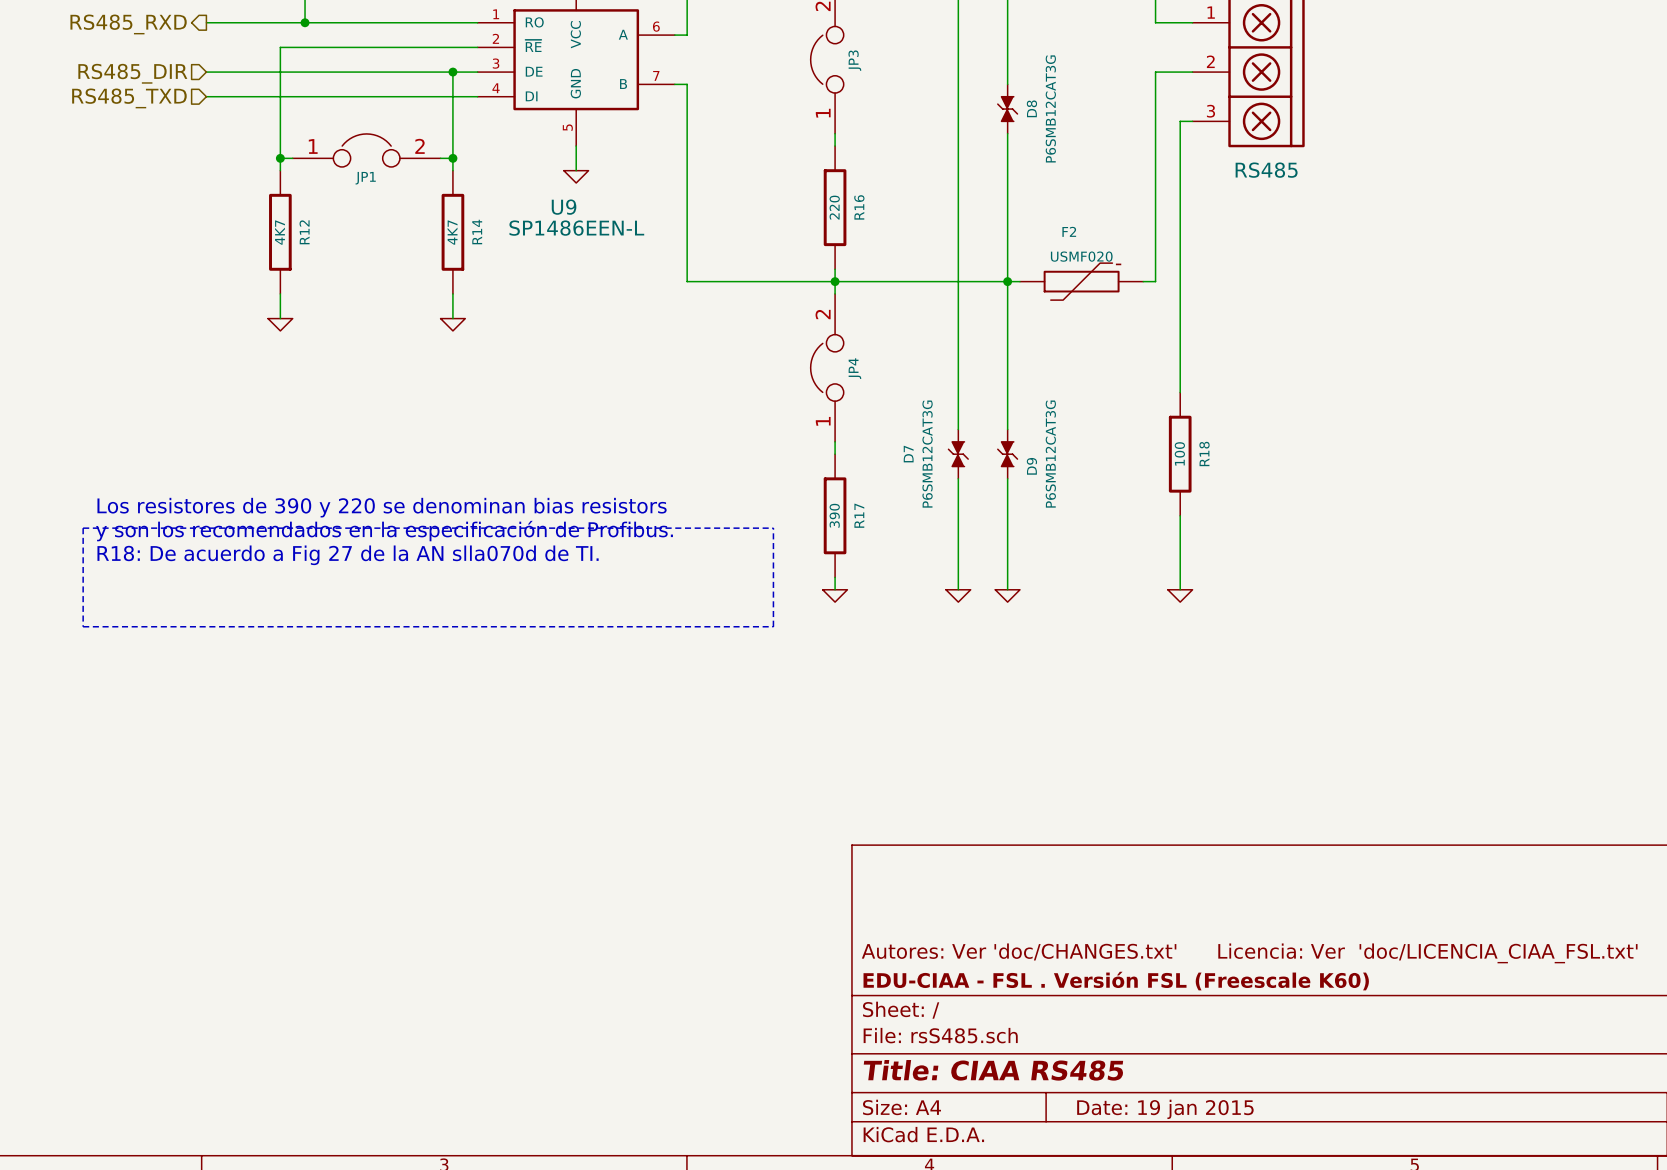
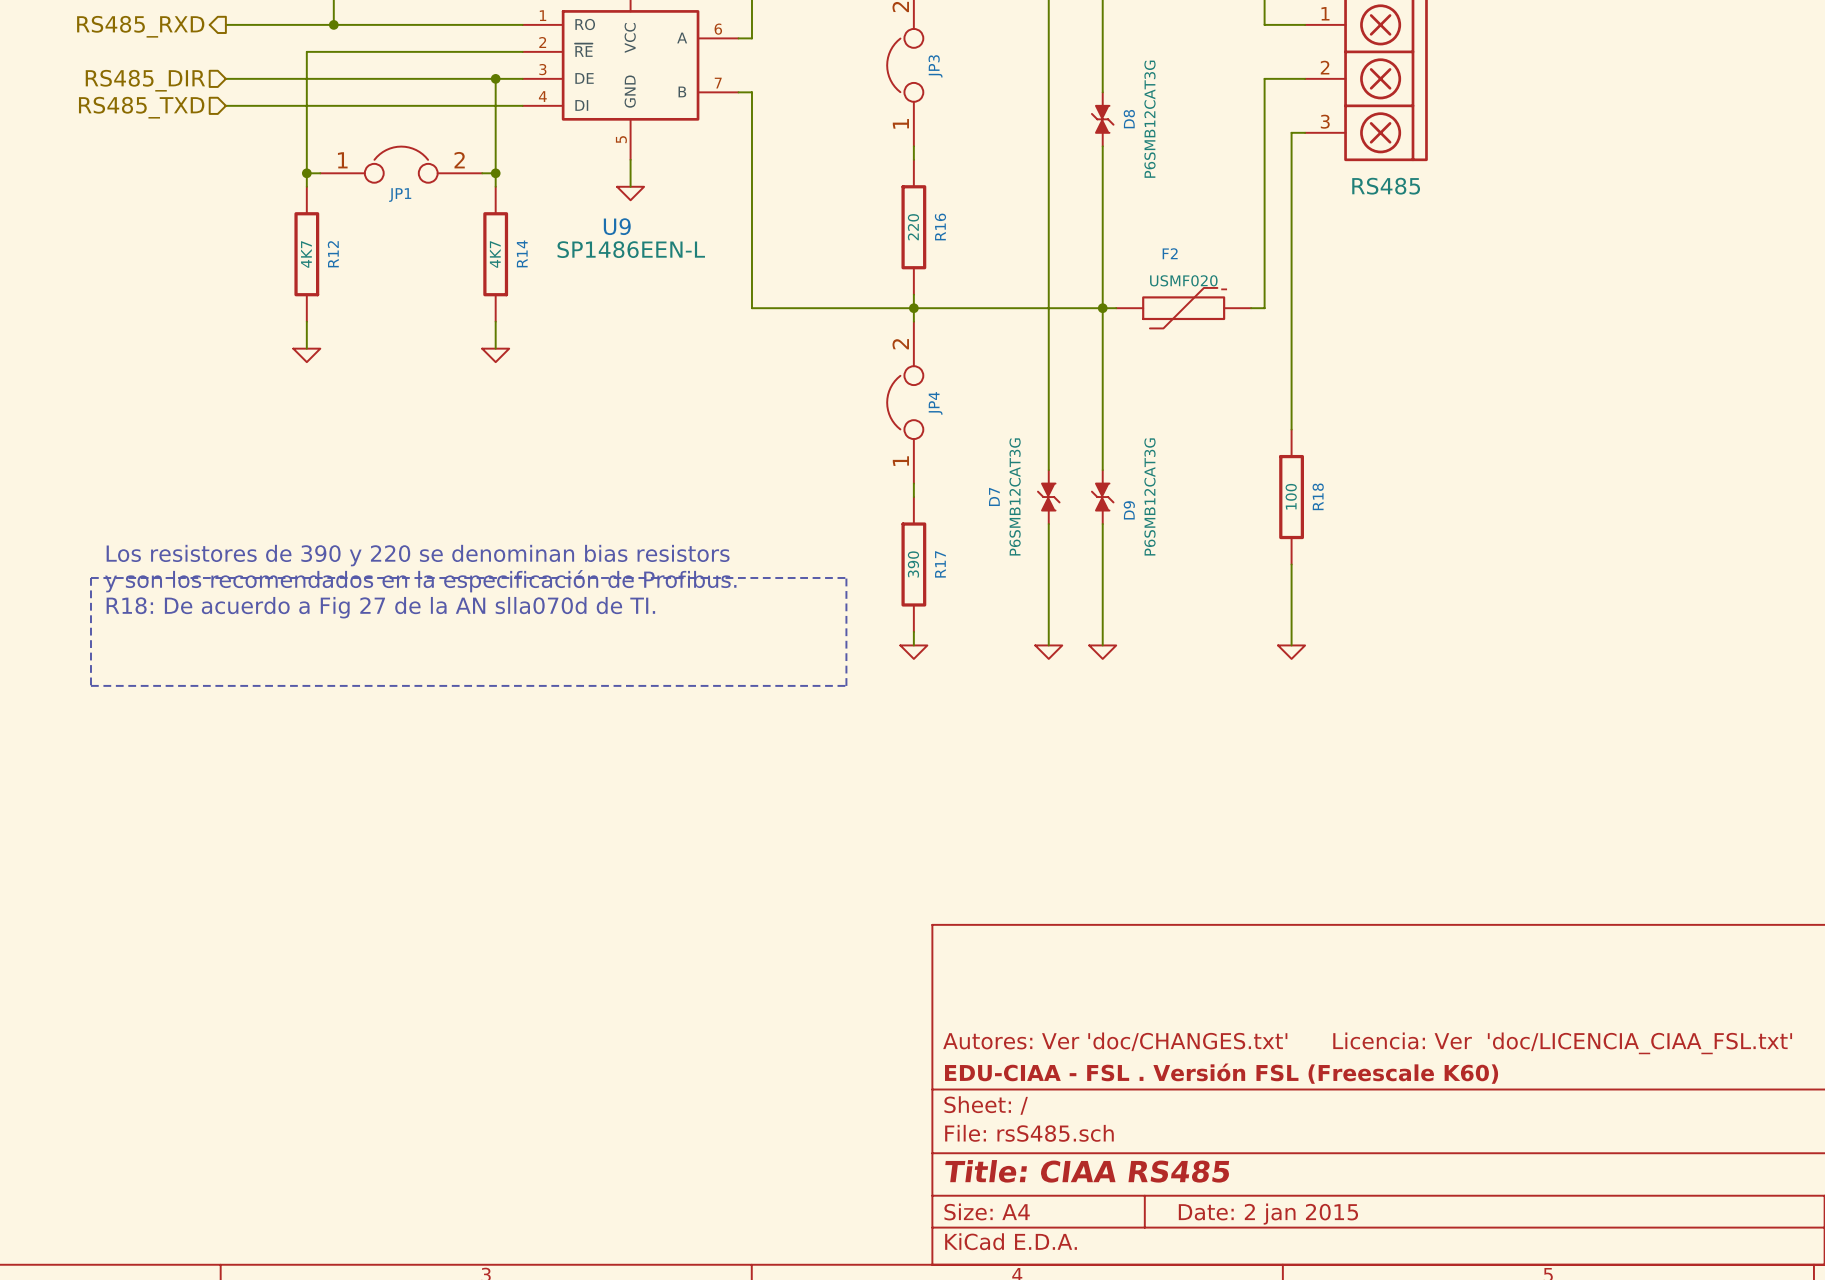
title block: Date: 19 jan 2015 (1165, 1109) -> Date: 2 jan 2015 (1268, 1214)

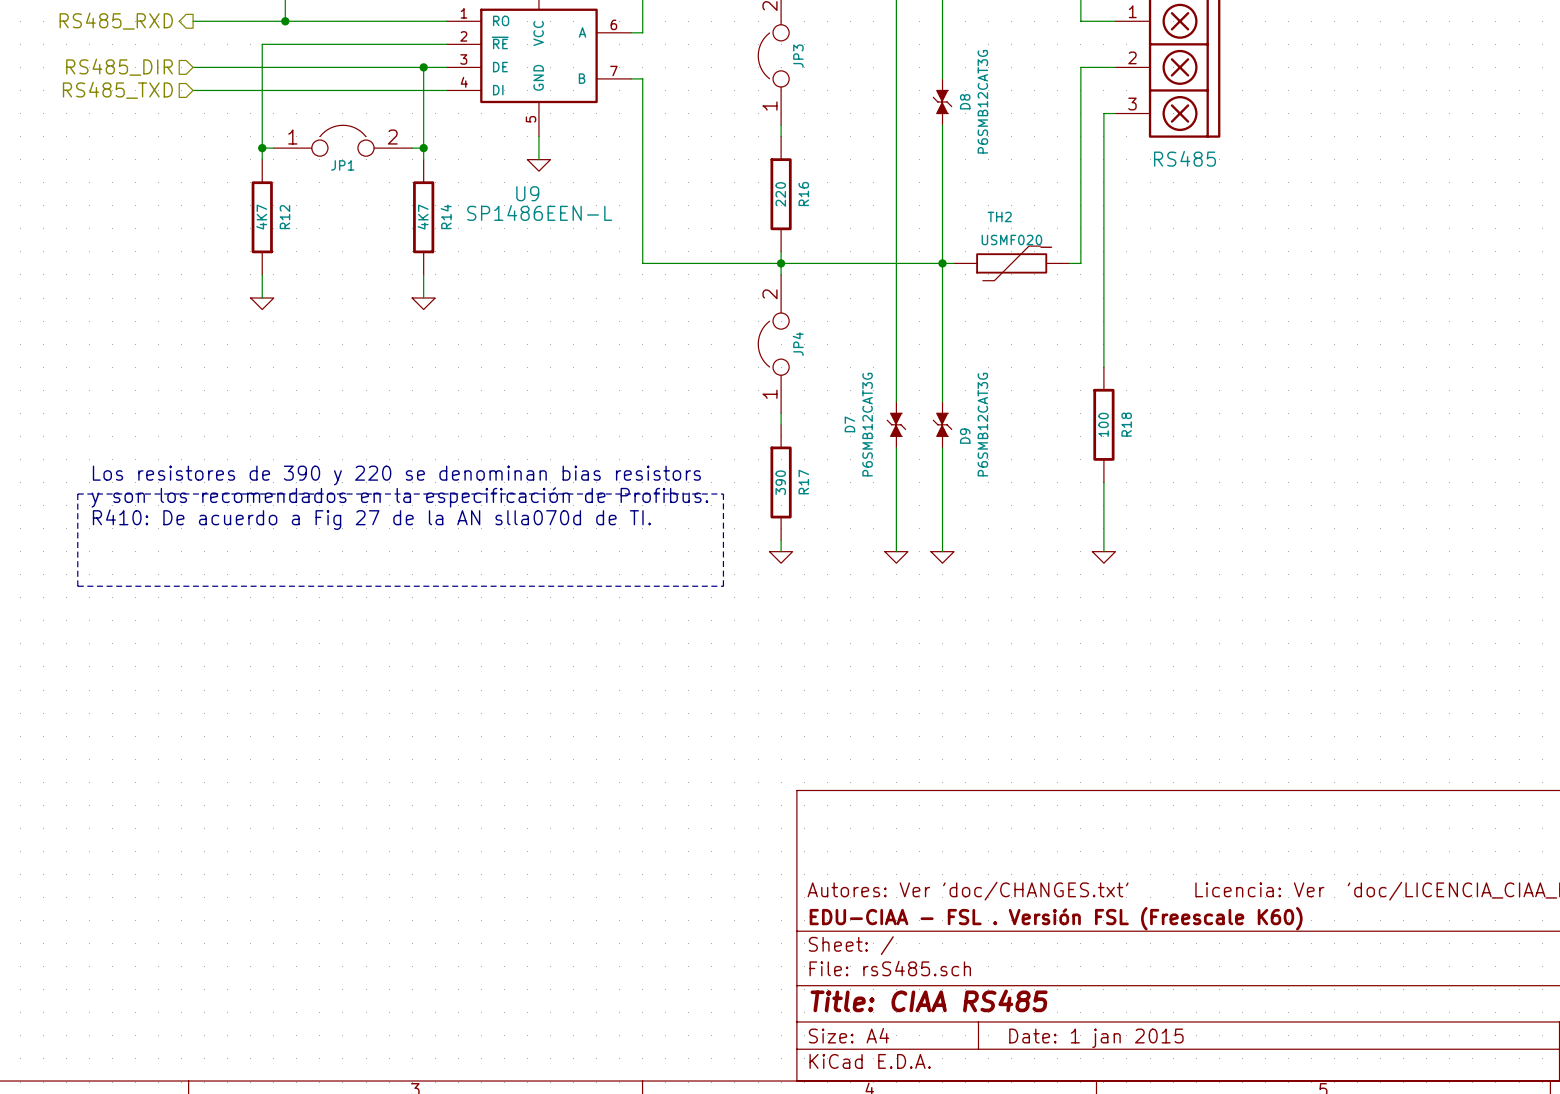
F2 name: F2 (1170, 253) -> TH2 (999, 216)
text: R18: De acuerdo a Fig 27 de la AN slla070d de TI. (380, 607) -> R410: De acuerdo a Fig 27 de la AN slla070d de TI. (371, 519)
title block: Date: 2 jan 2015 (1268, 1214) -> Date: 1 jan 2015 (1096, 1038)

